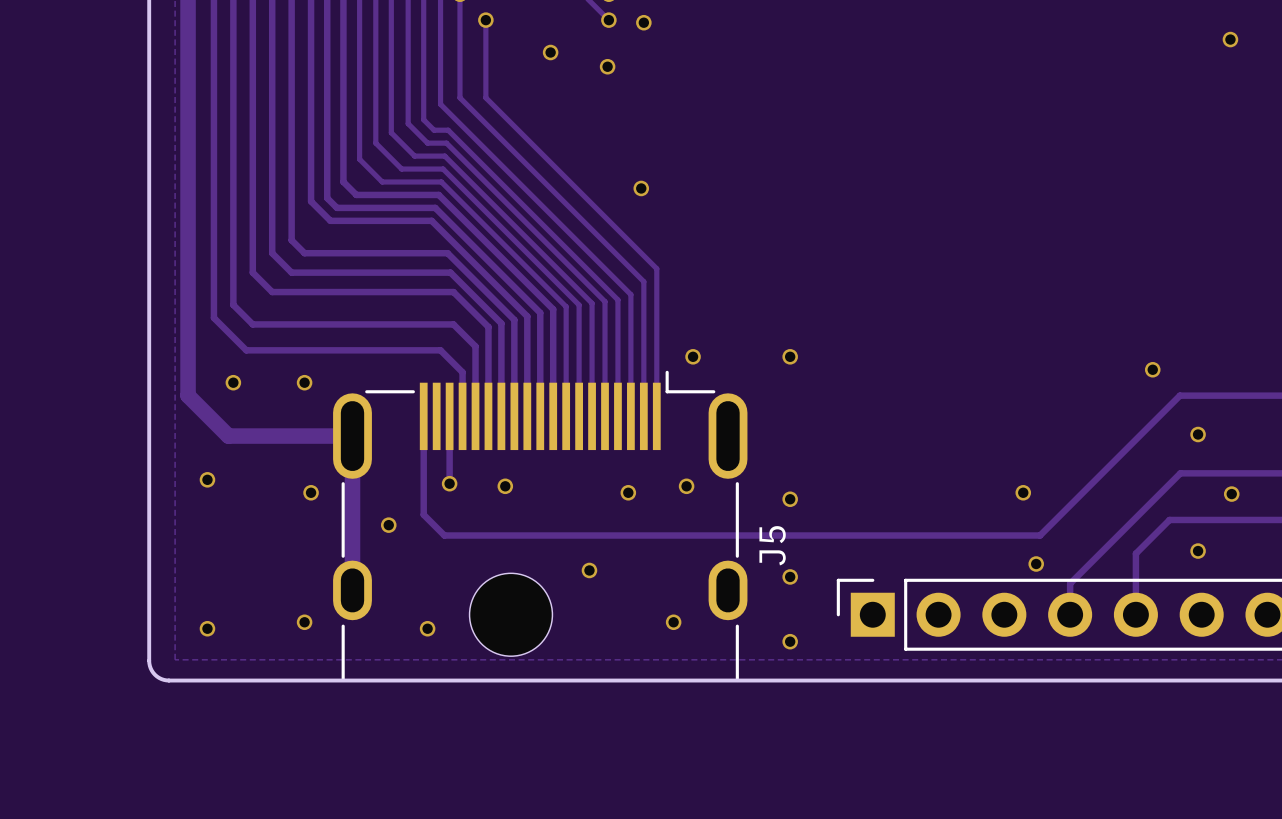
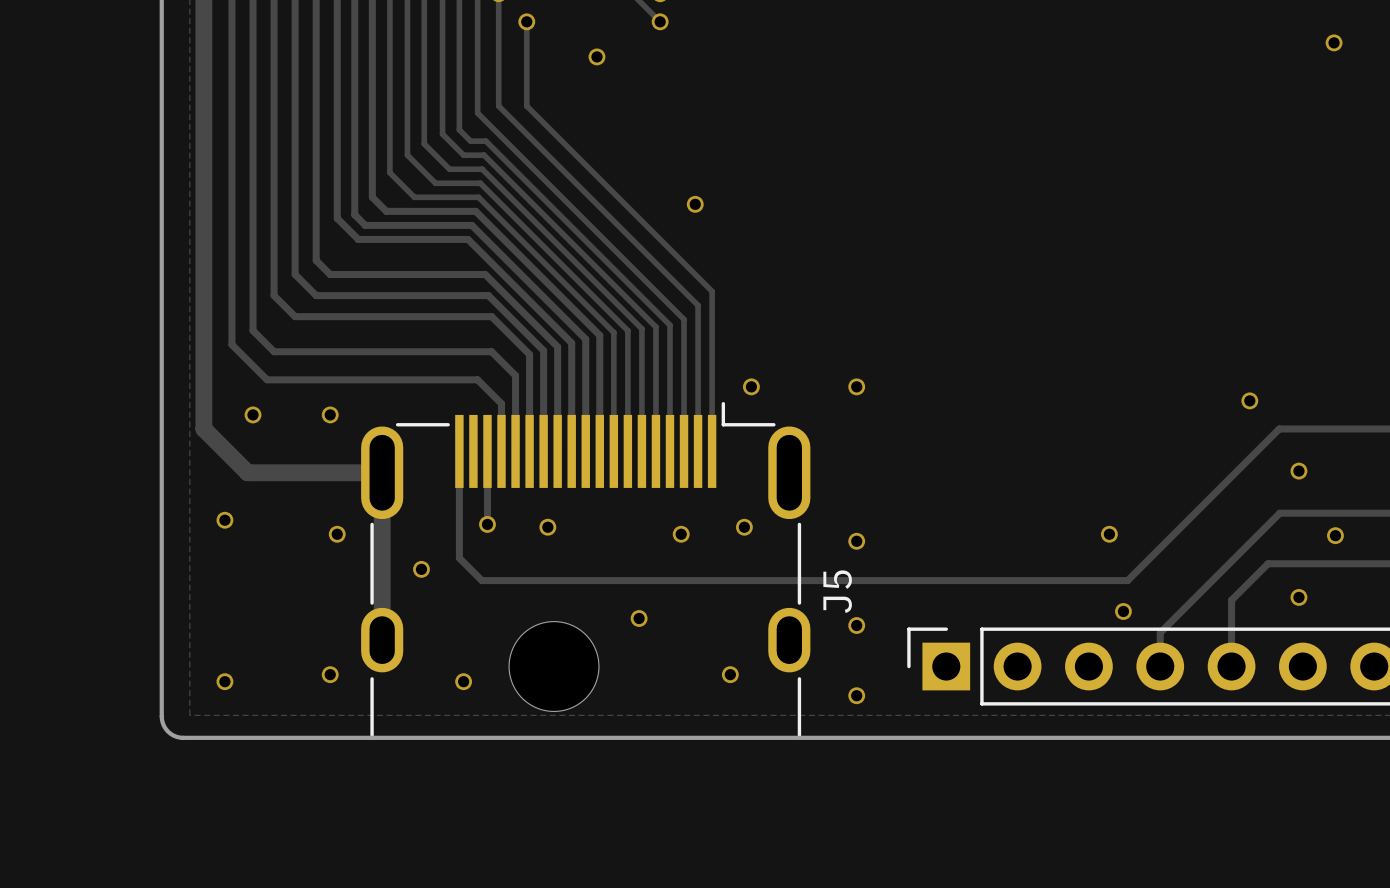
via: (643, 22) -> none
via: (607, 66) -> none

